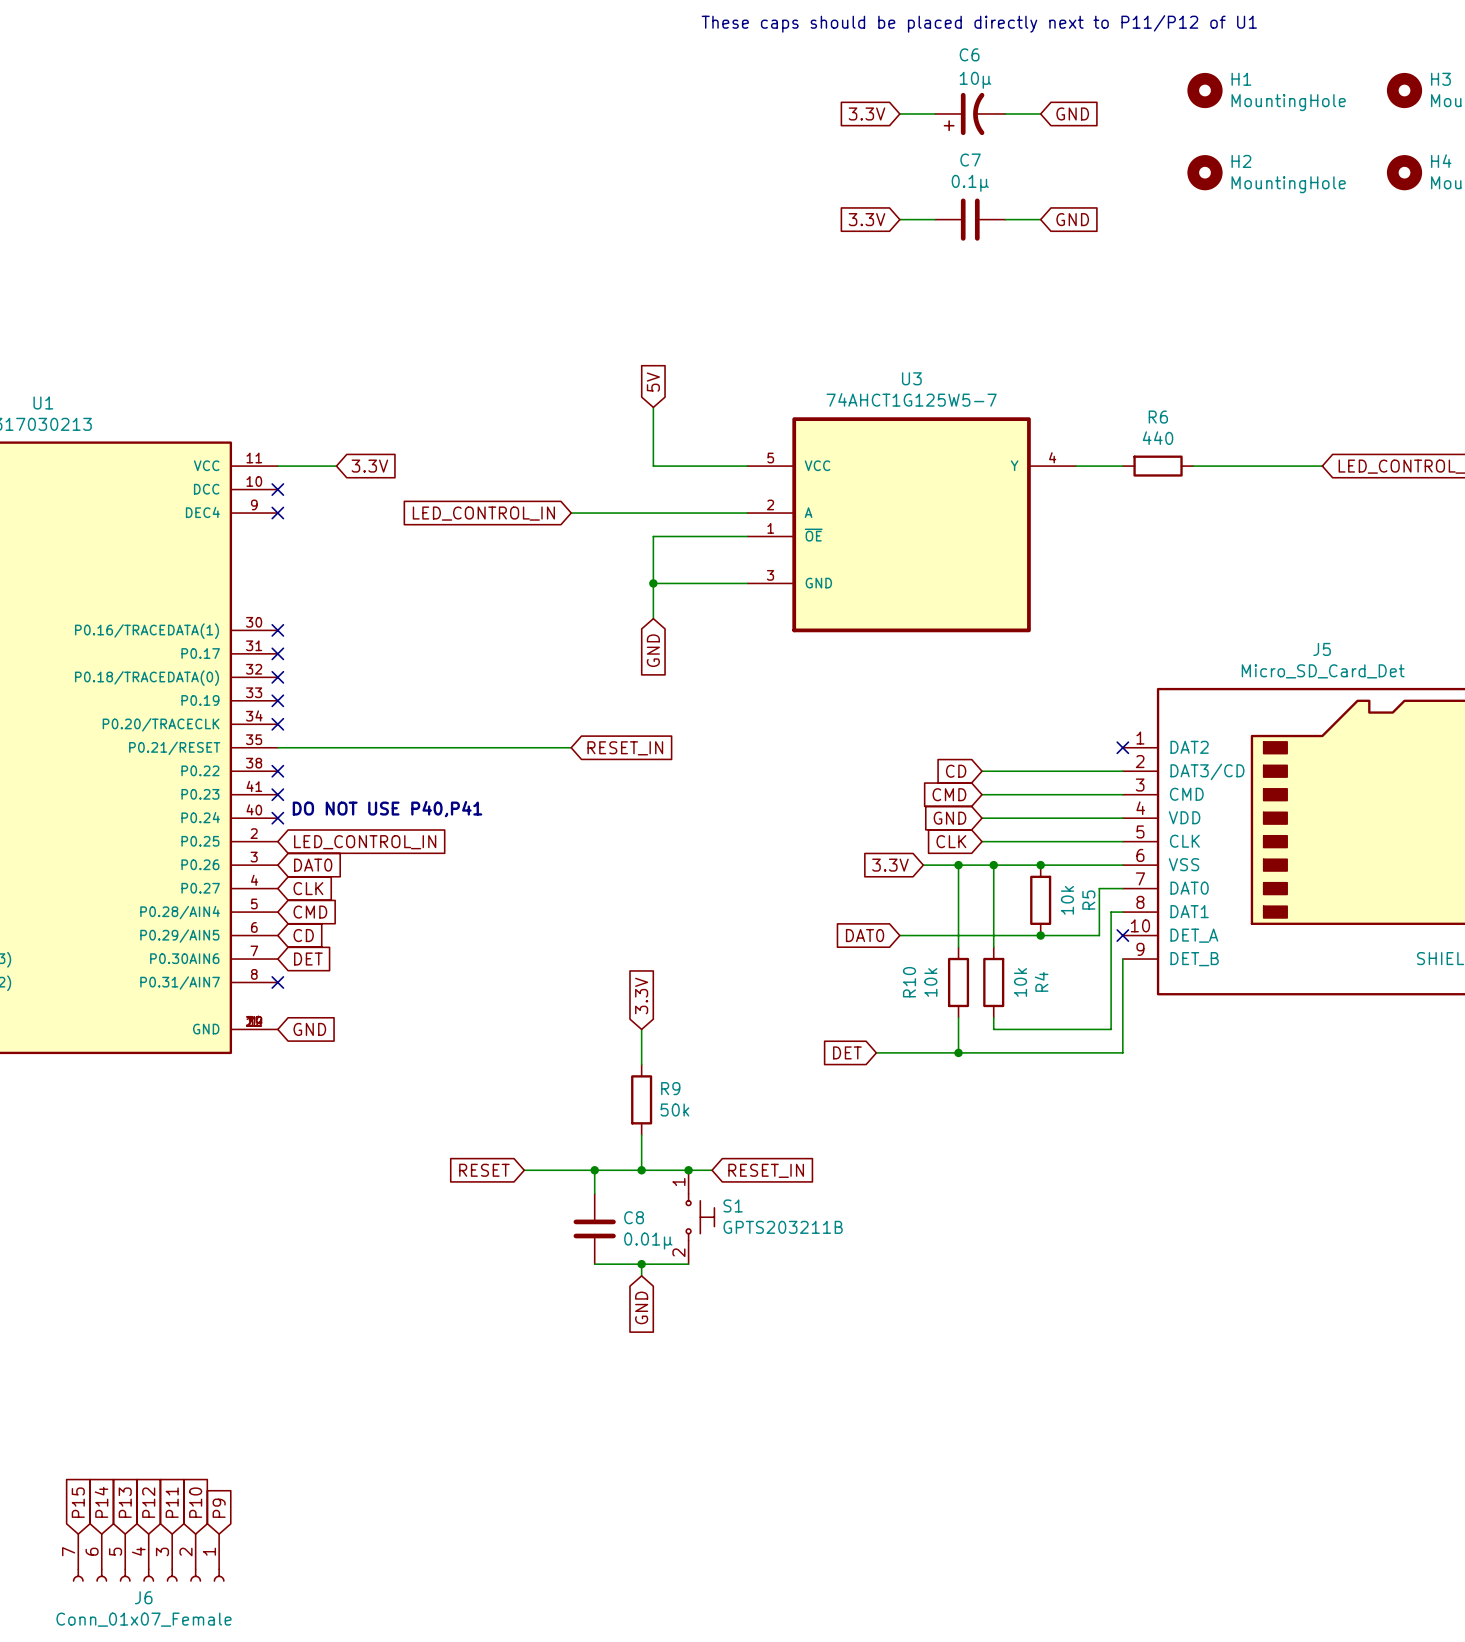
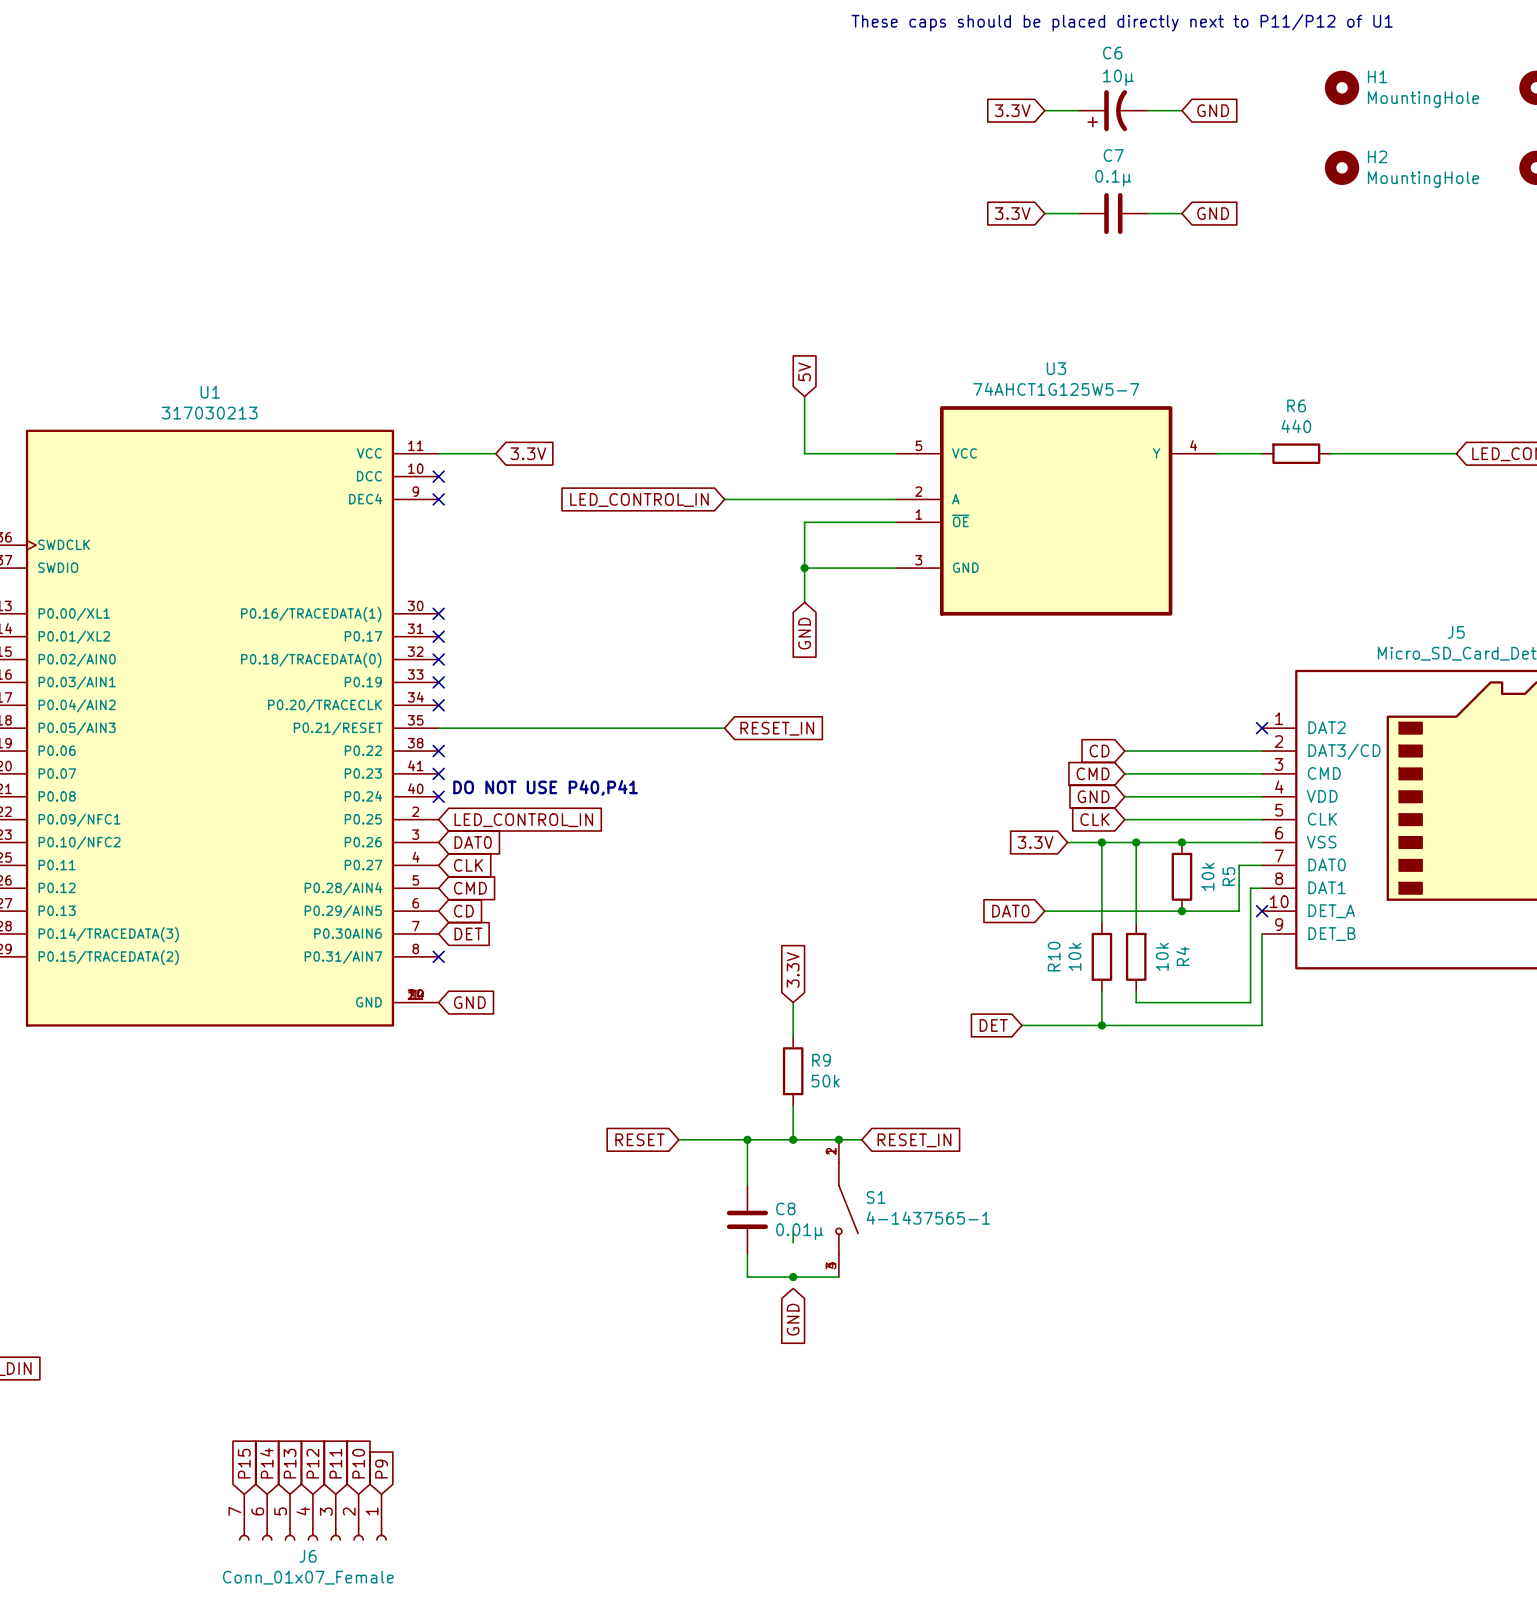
S1 symbol: [686, 1170, 715, 1265] -> [835, 1139, 859, 1278]
S1 value: GPTS203211B (783, 1227) -> 4-1437565-1 (928, 1218)
C8 position: (594, 1228) -> (747, 1219)
wire: (594, 1264) (688, 1264) -> none
junction position: (641, 1264) -> (793, 1277)
wire: none -> (747, 1254) (747, 1277) (838, 1277)
global label position: GND (641, 1307) -> GND (793, 1319)

